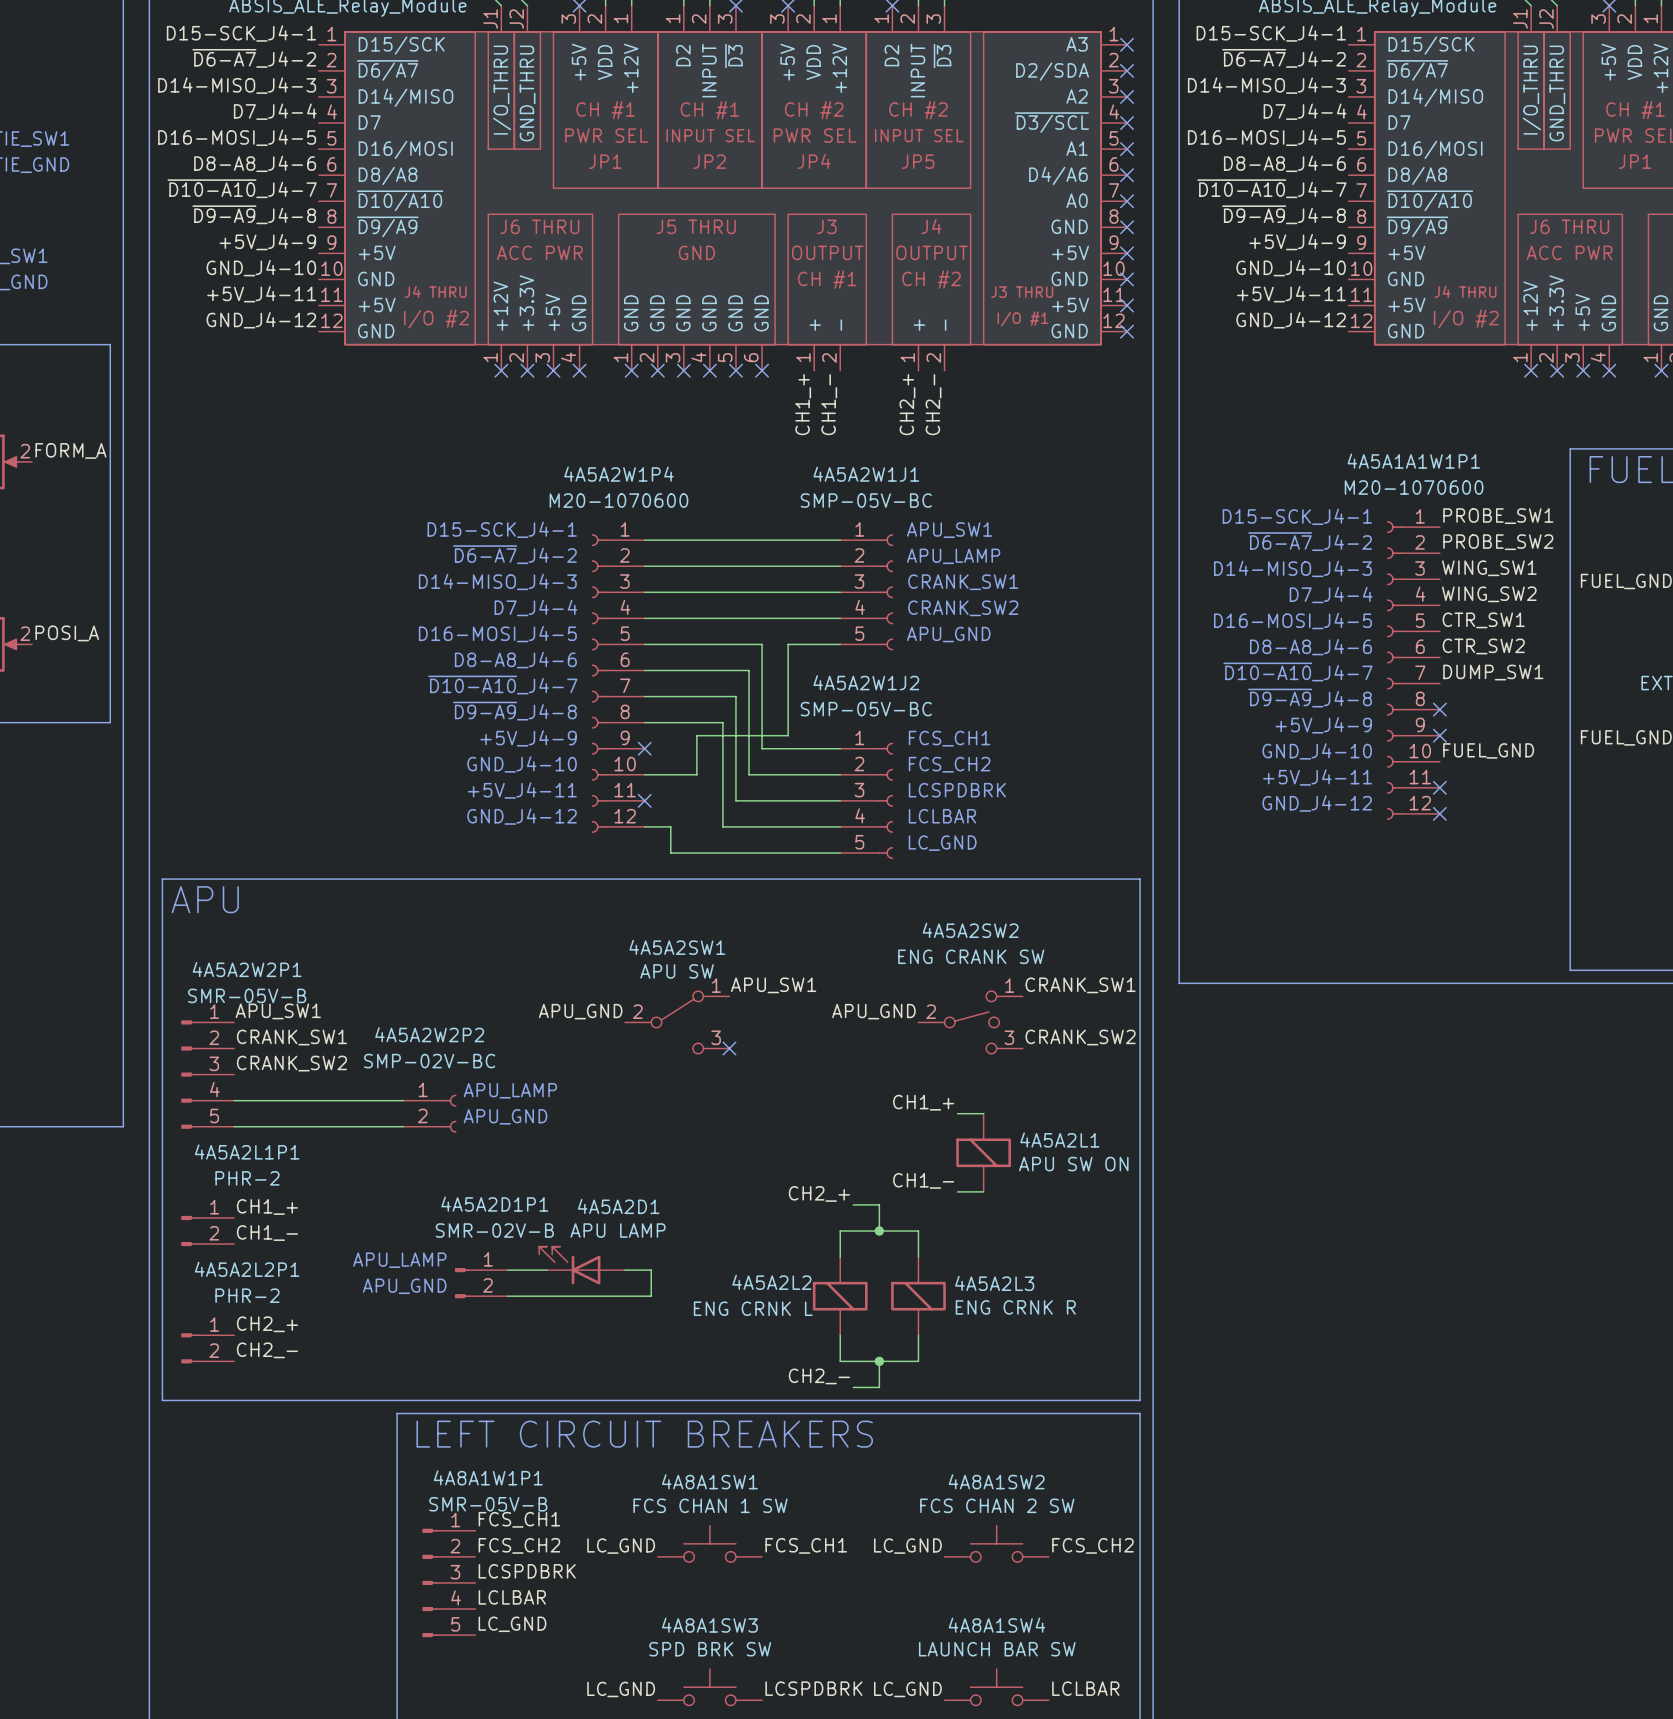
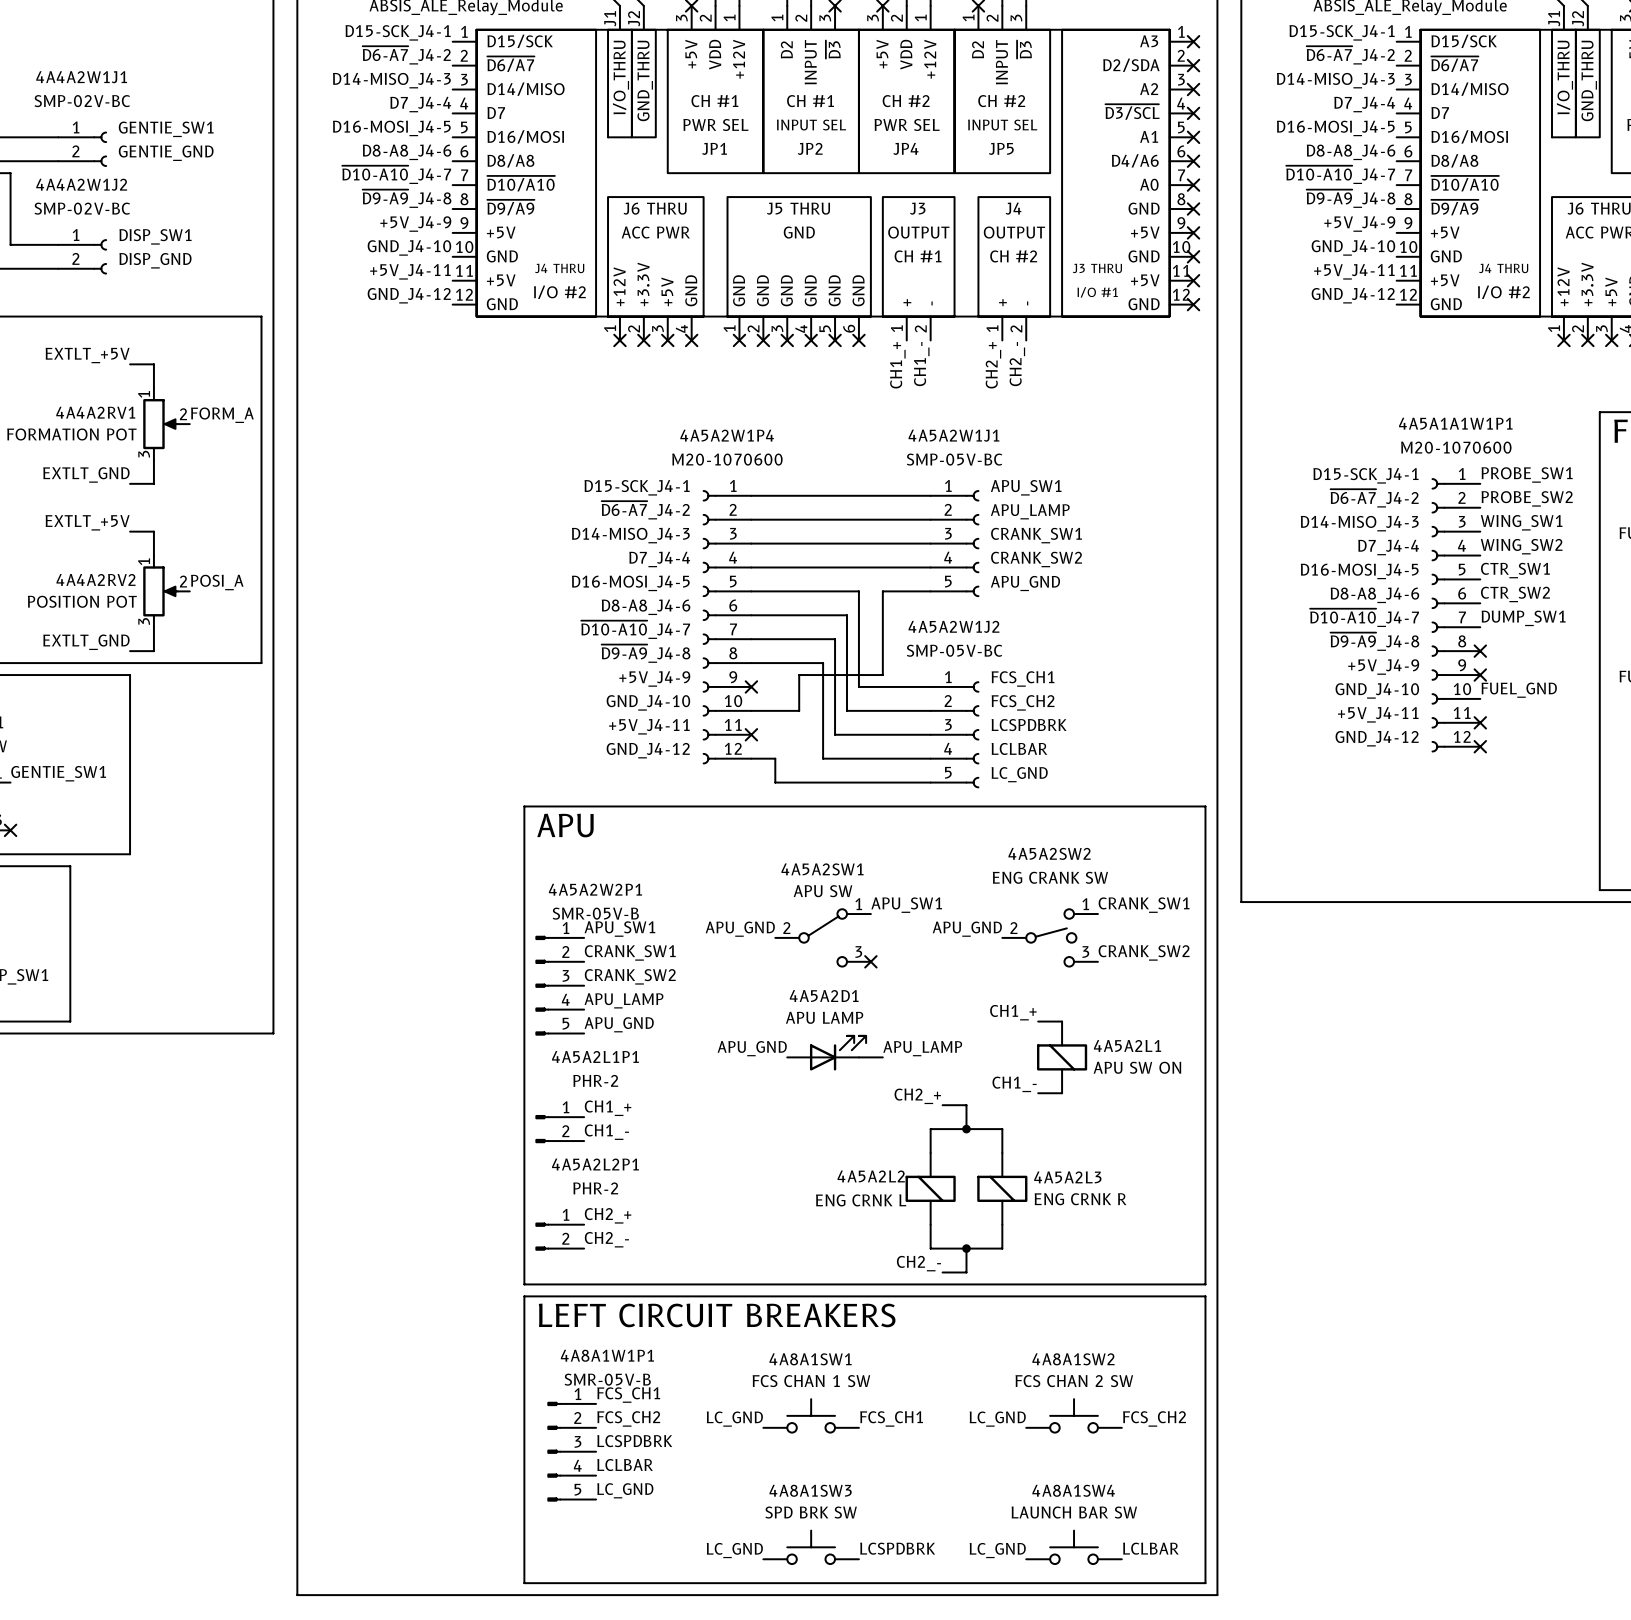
line: (397, 879) (162, 879) (162, 1400) (397, 1400) -> (524, 806) (524, 1284)
text position: APU (205, 899) -> APU (565, 825)
label position: APU_SW1 (773, 985) -> APU_SW1 (906, 905)
label: APU_SW1 (278, 1011) -> none
label: none -> APU_SW1 (619, 929)
label position: APU_GND (580, 1011) -> APU_GND (740, 929)
4A5A2SW1 position: (677, 1022) -> (823, 937)
label position: CRANK_SW1 (291, 1037) -> CRANK_SW1 (630, 952)
no-connect mark position: (729, 1048) -> (870, 961)
label position: CRANK_SW2 (291, 1063) -> CRANK_SW2 (630, 976)
4A5A2W2P1 position: (207, 1074) -> (559, 985)
label: none -> APU_LAMP (624, 1000)
text: APU_LAMP (510, 1090) -> none
wire: (234, 1100) (403, 1100) -> none
4A5A2W2P2: SMP-02V-BC (430, 1113) -> none
label: none -> APU_GND (619, 1024)
text: APU_GND (505, 1116) -> none
wire: (234, 1126) (403, 1126) -> none
label: none -> APU_GND (752, 1048)
label: none -> APU_LAMP (922, 1048)
wire: none -> (858, 1057) (882, 1057)
label position: CH1_+ (267, 1206) -> CH1_+ (608, 1108)
4A5A2D1 name position: 4A5A2D1 (618, 1206) -> 4A5A2D1 (824, 996)
4A5A2D1 value position: APU LAMP (618, 1230) -> APU LAMP (824, 1017)
4A5A2L1P1 position: (207, 1231) -> (559, 1129)
label position: CH1_- (267, 1233) -> CH1_- (606, 1132)
text: APU_LAMP (399, 1260) -> none
4A5A2D1 flip: as is (569, 1265) -> left-right (838, 1053)
4A5A2D1 position: (582, 1265) -> (826, 1053)
wire: (507, 1270) (546, 1270) -> none
wire: (625, 1270) (651, 1270) (651, 1296) (507, 1296) -> none
4A5A2D1P1: SMR-02V-B (481, 1283) -> none
text: APU_GND (404, 1286) -> none
label position: CH2_+ (267, 1324) -> CH2_+ (608, 1215)
4A5A2L2P1 position: (207, 1348) -> (559, 1236)
label position: CH2_- (267, 1350) -> CH2_- (606, 1239)

